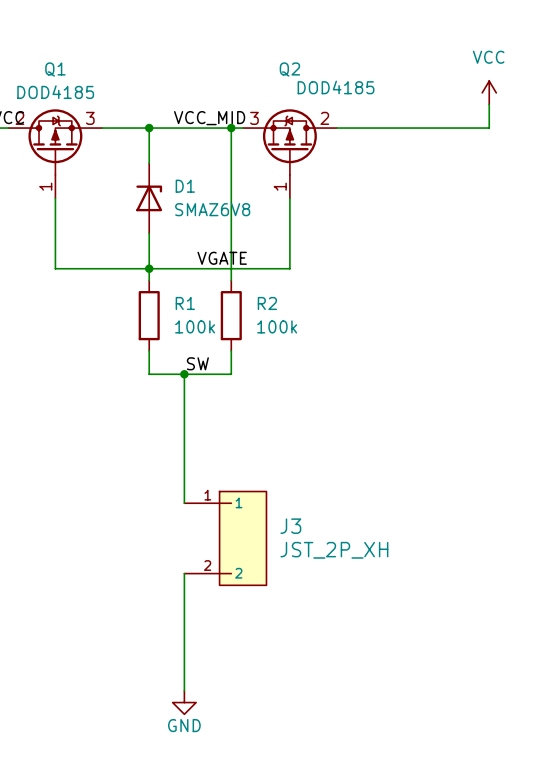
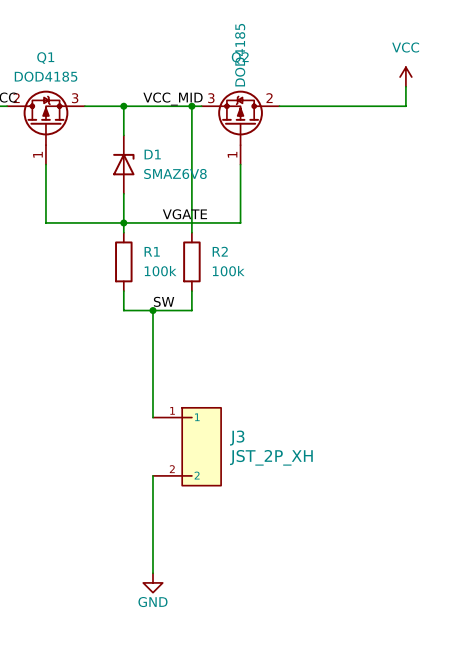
Q2 value rotation: 0° (336, 87) -> 90° counterclockwise (240, 55)

